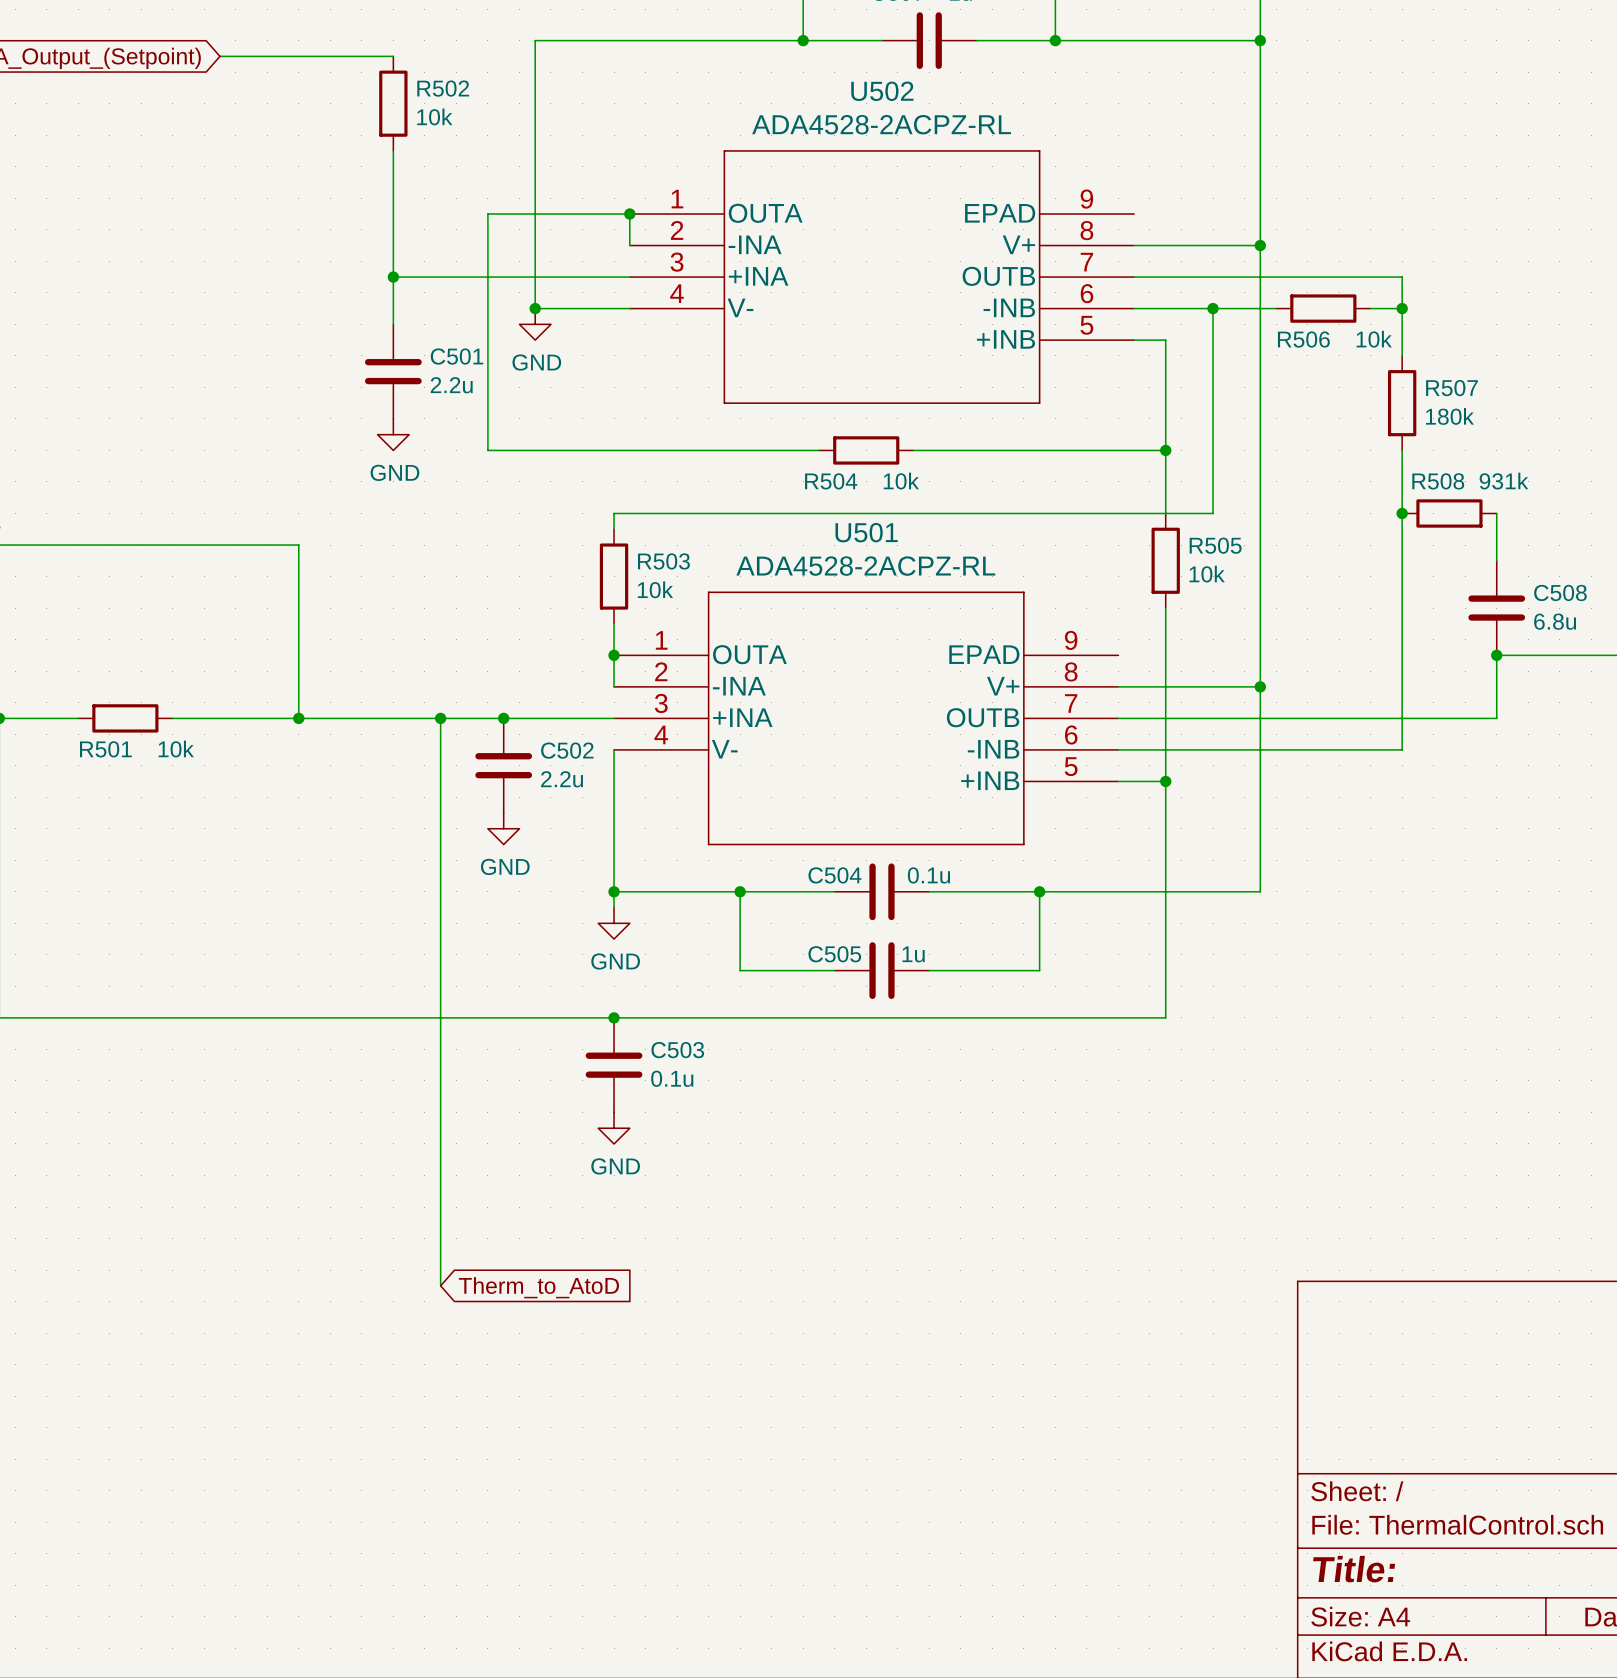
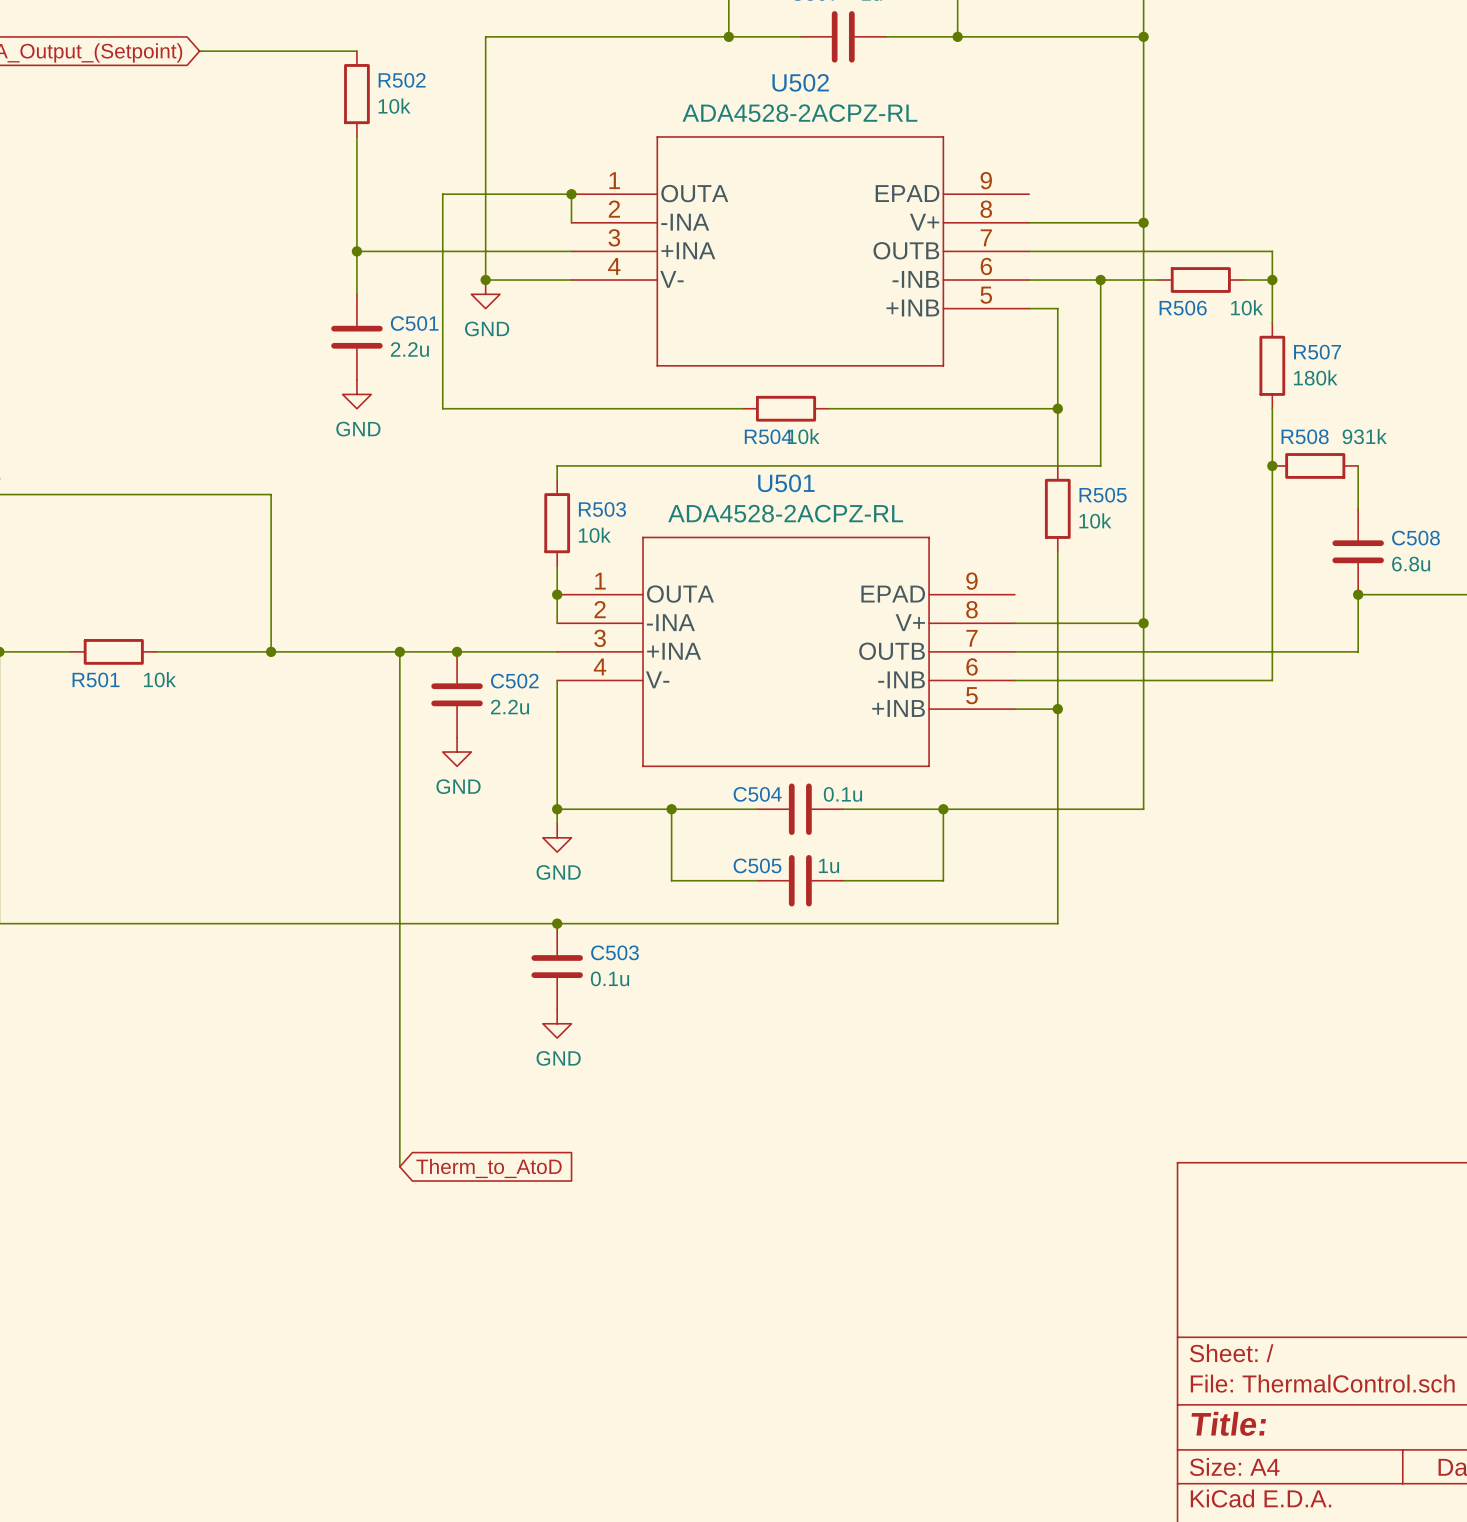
R504 name position: R504 (831, 481) -> R504 (768, 436)
R504 value position: 10k (901, 481) -> 10k (803, 436)

